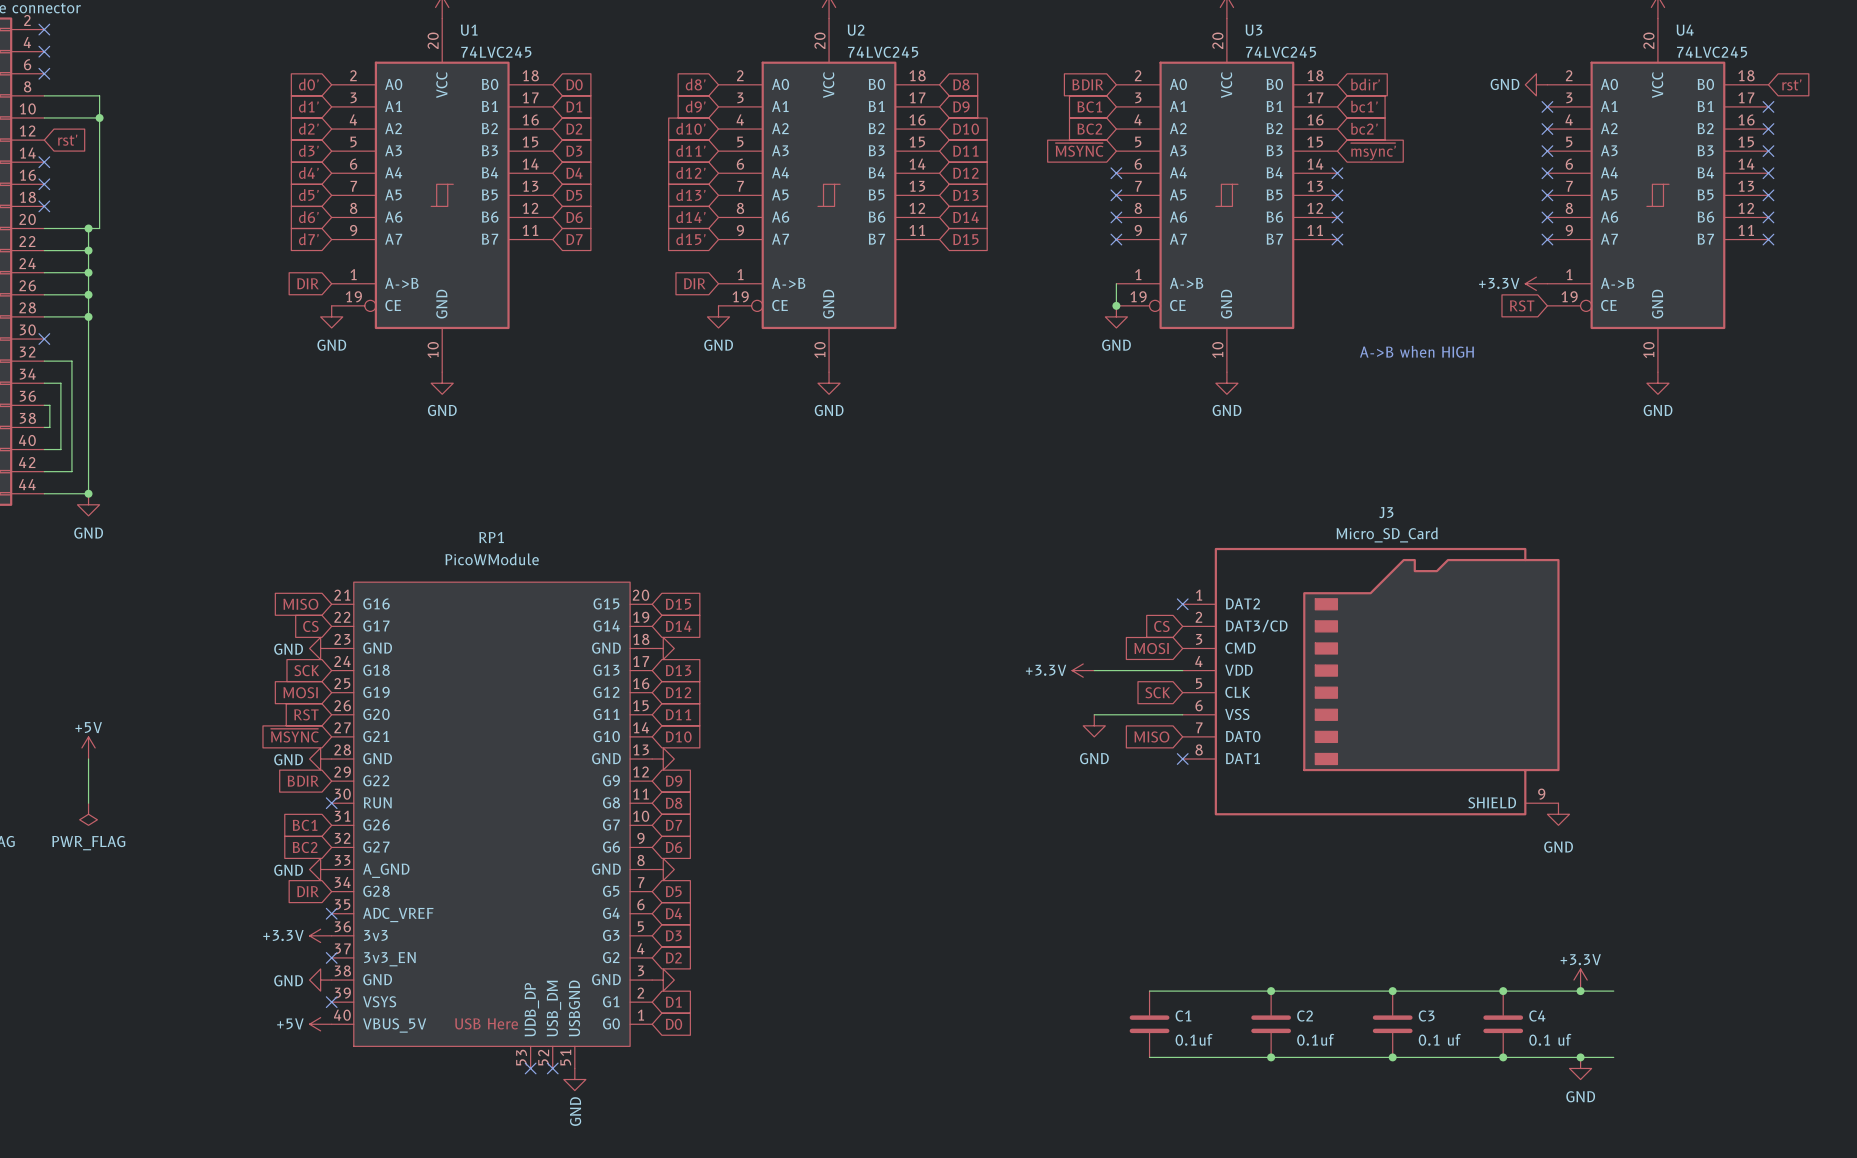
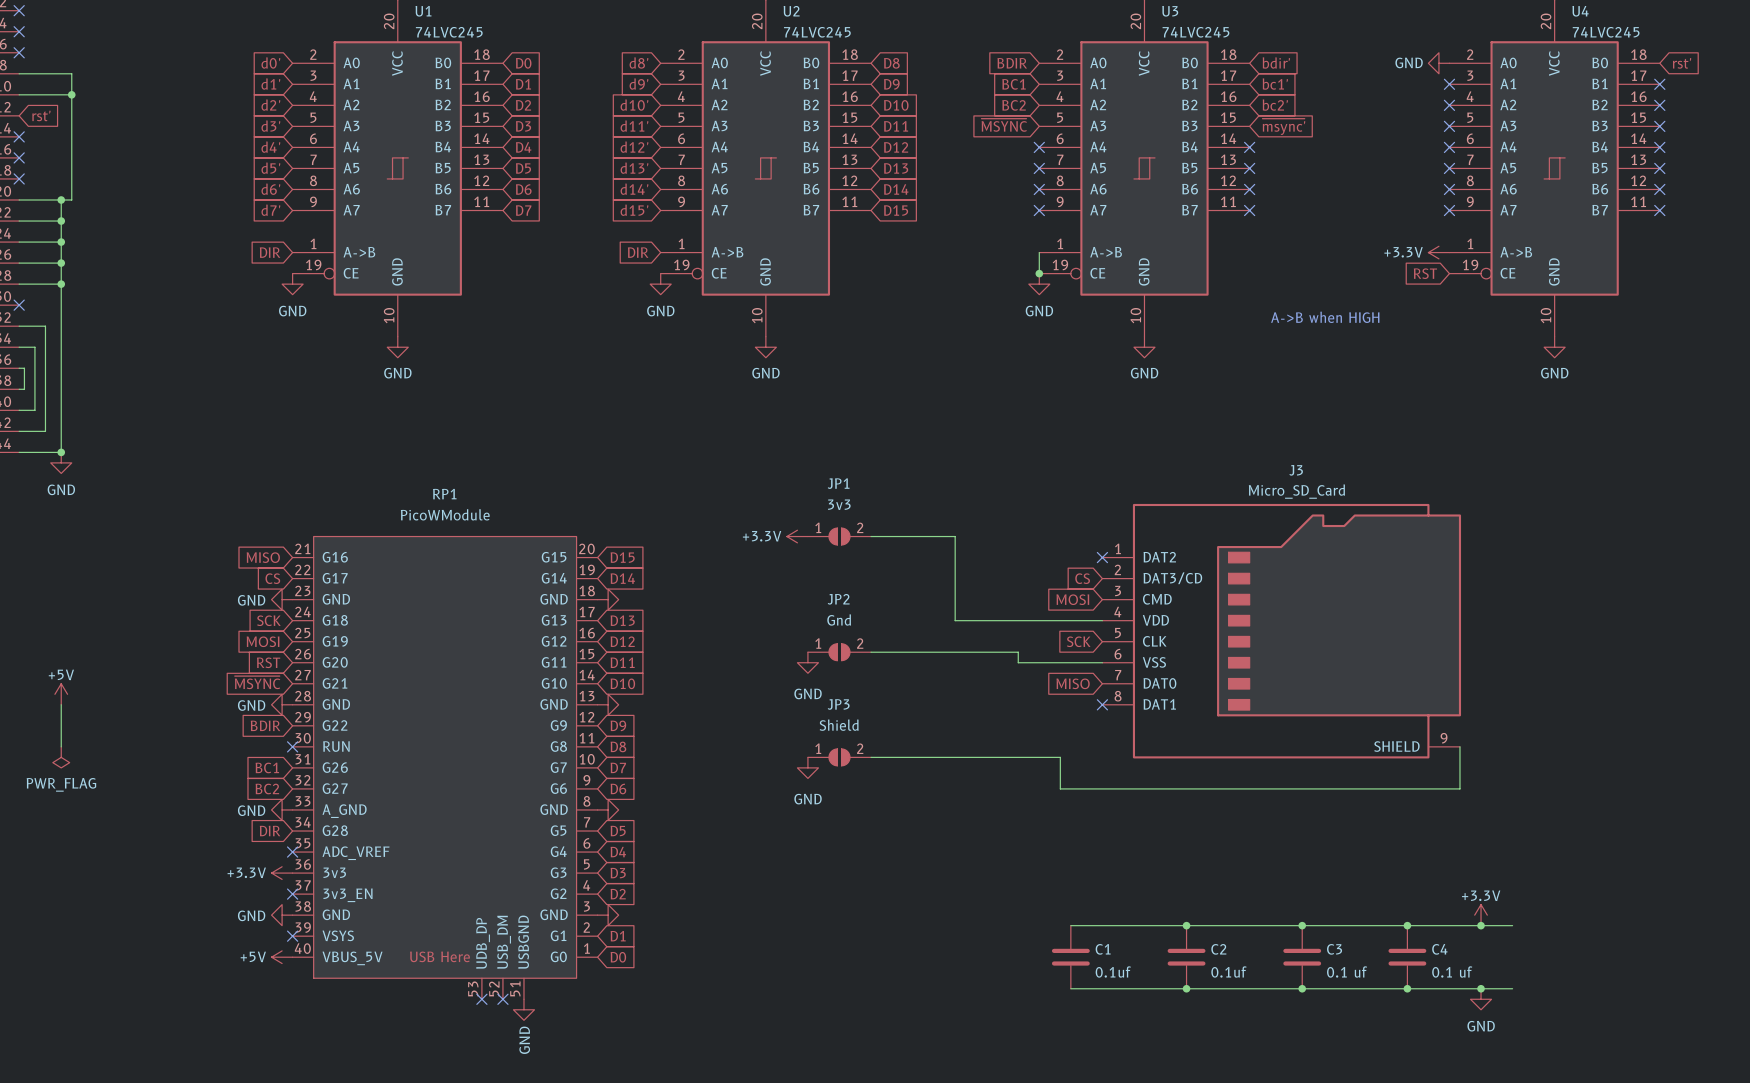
power symbol: none -> +3.3V (797, 536)
JP1: none -> 3v3 (839, 536)
wire: none -> (871, 536) (955, 536) (955, 620) (1018, 620)
power symbol: +3.3V (1083, 670) -> none
JP2: none -> Gnd (839, 652)
wire: none -> (871, 652) (1018, 652) (1018, 662)
power symbol: none -> GND (807, 662)
power symbol: GND (1094, 725) -> none
wire: none -> (1459, 746) (1459, 788) (1060, 788) (1060, 757) (871, 757)
JP3: none -> Shield (839, 757)
power symbol: GND (1558, 814) -> none
power symbol: none -> GND (807, 767)

